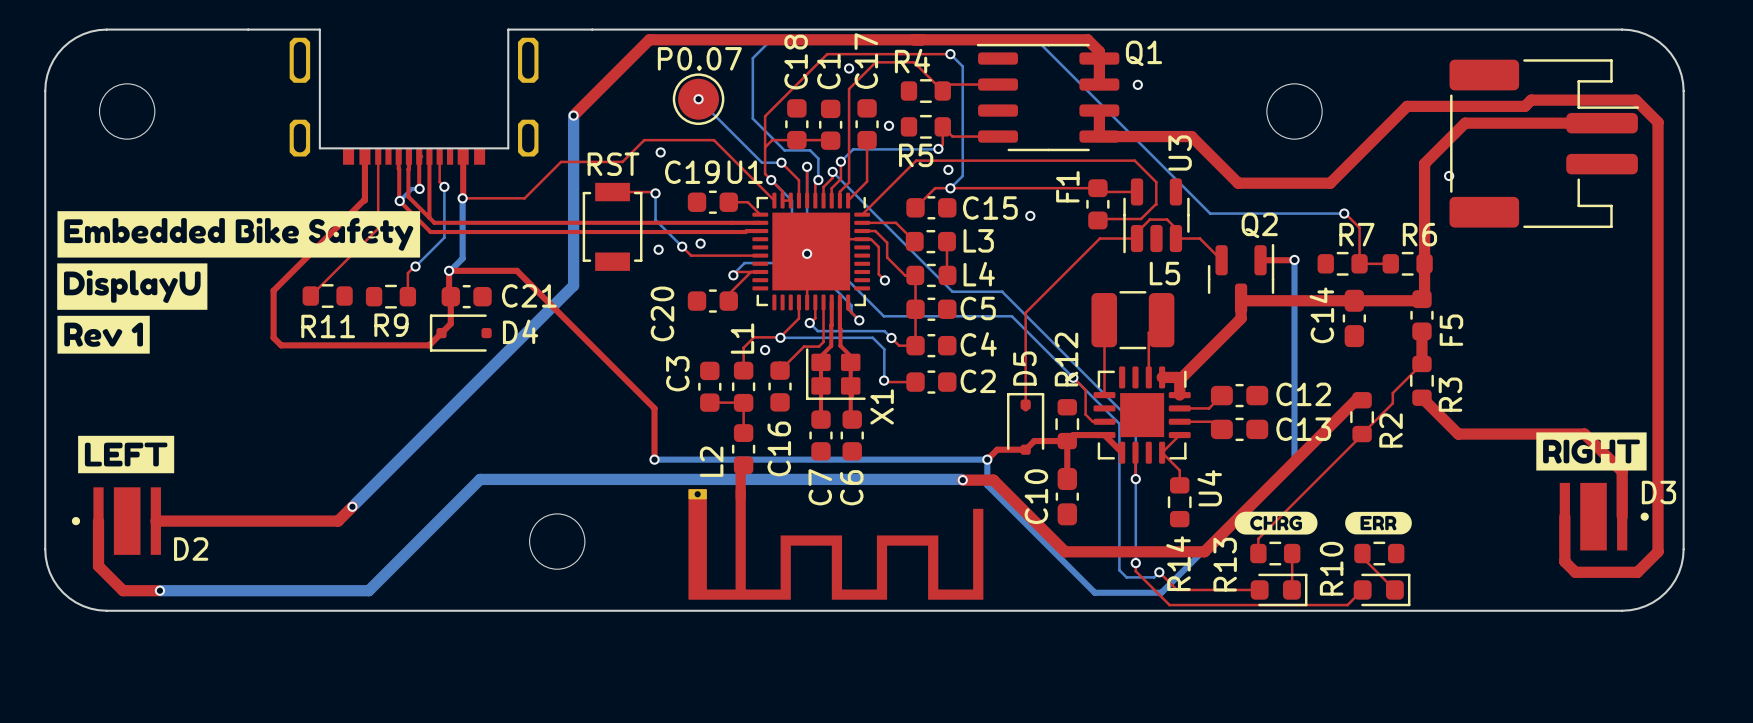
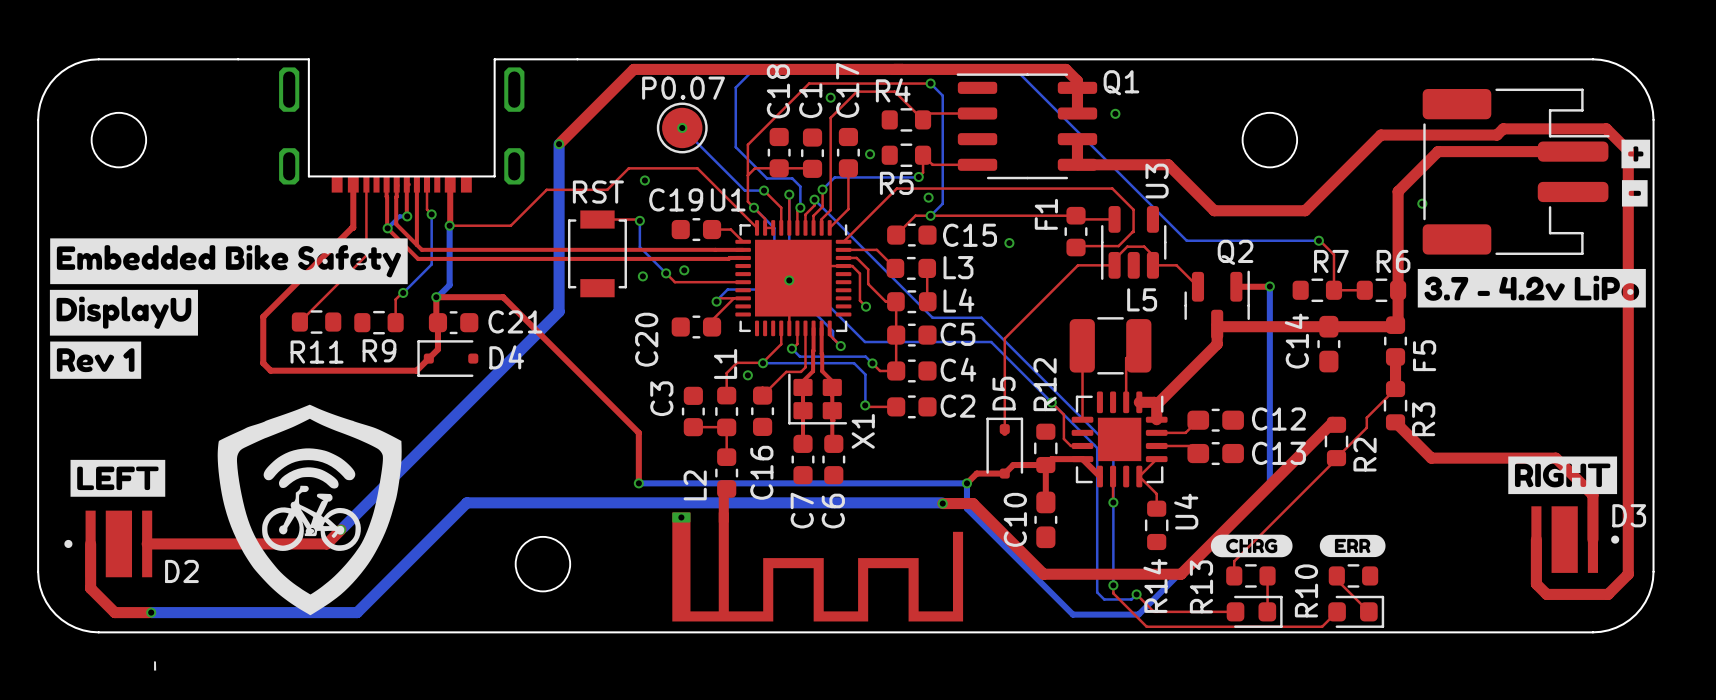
drawing: none -> [1621, 139, 1651, 207]
drawing: none -> [1417, 268, 1646, 308]
drawing: none -> [154, 404, 402, 671]

